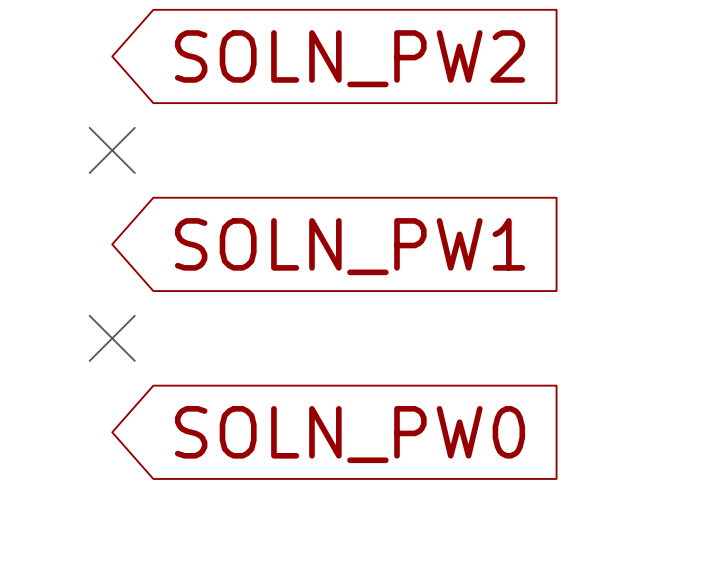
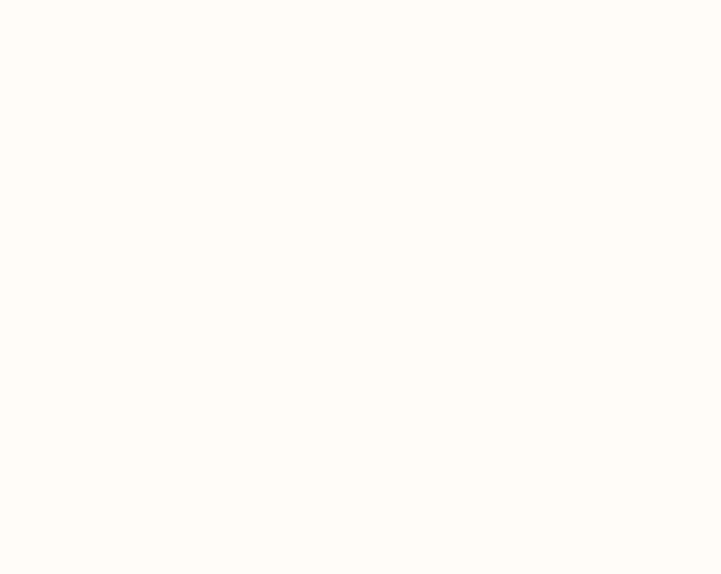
global label: SOLN_PW2 (350, 58) -> none
no-connect mark: (112, 150) -> none
global label: SOLN_PW1 (350, 246) -> none
no-connect mark: (112, 338) -> none
global label: SOLN_PW0 (350, 434) -> none

